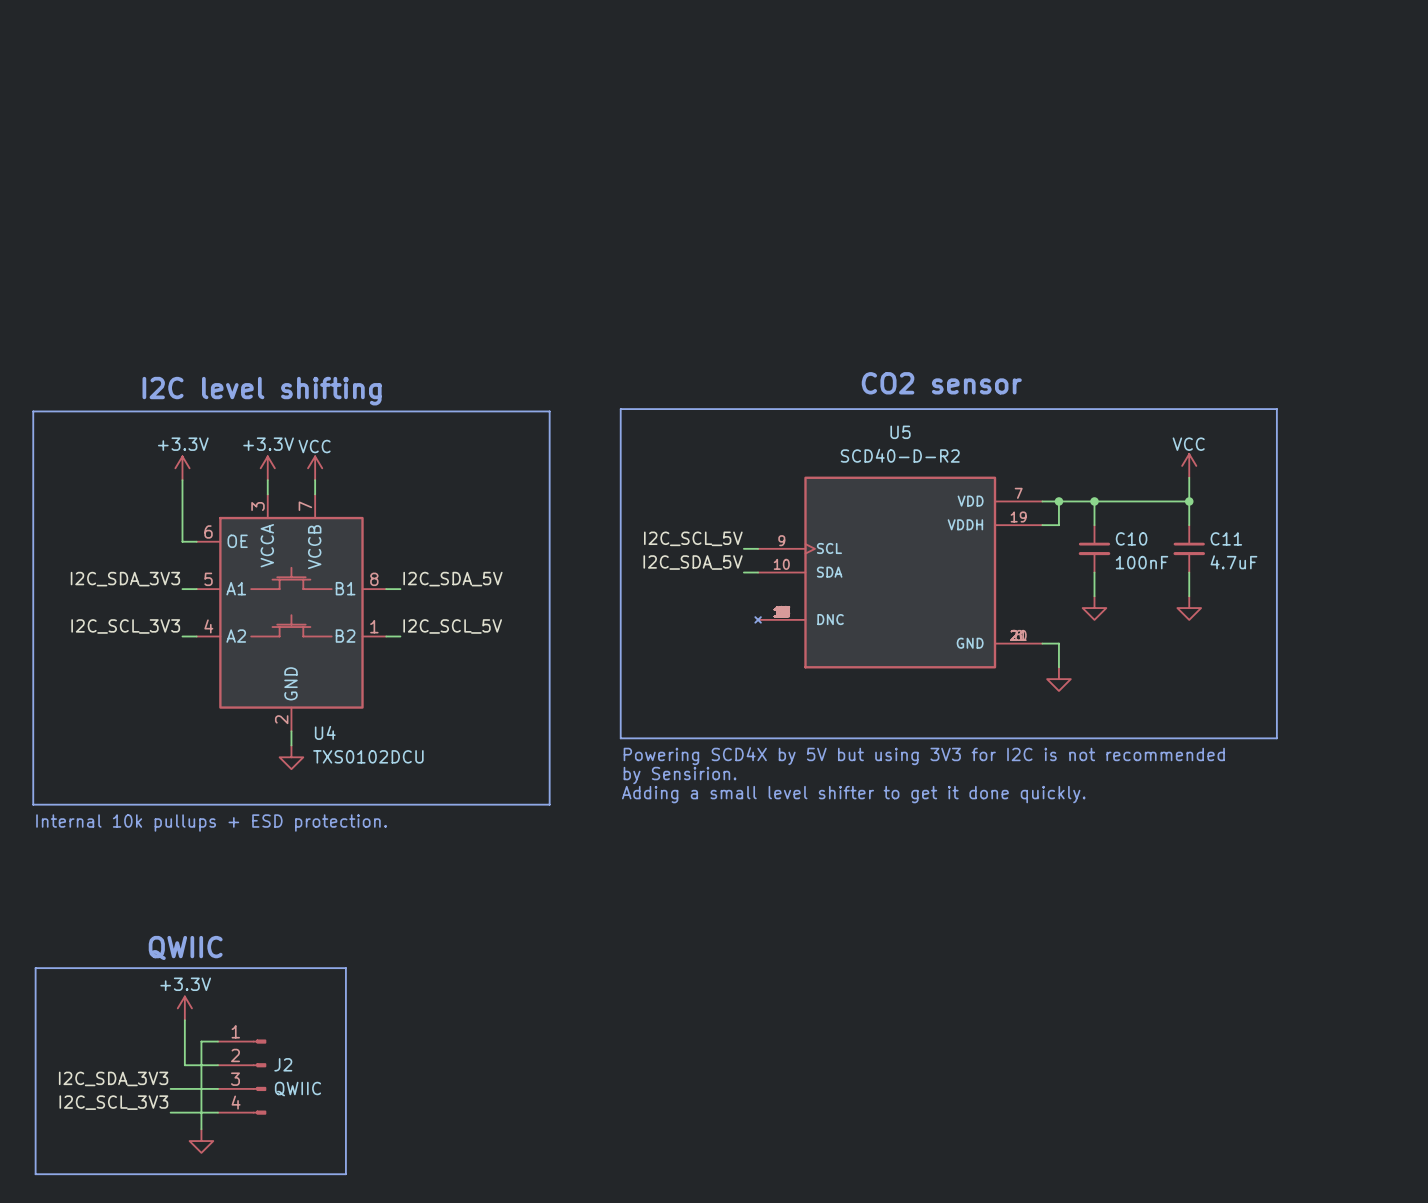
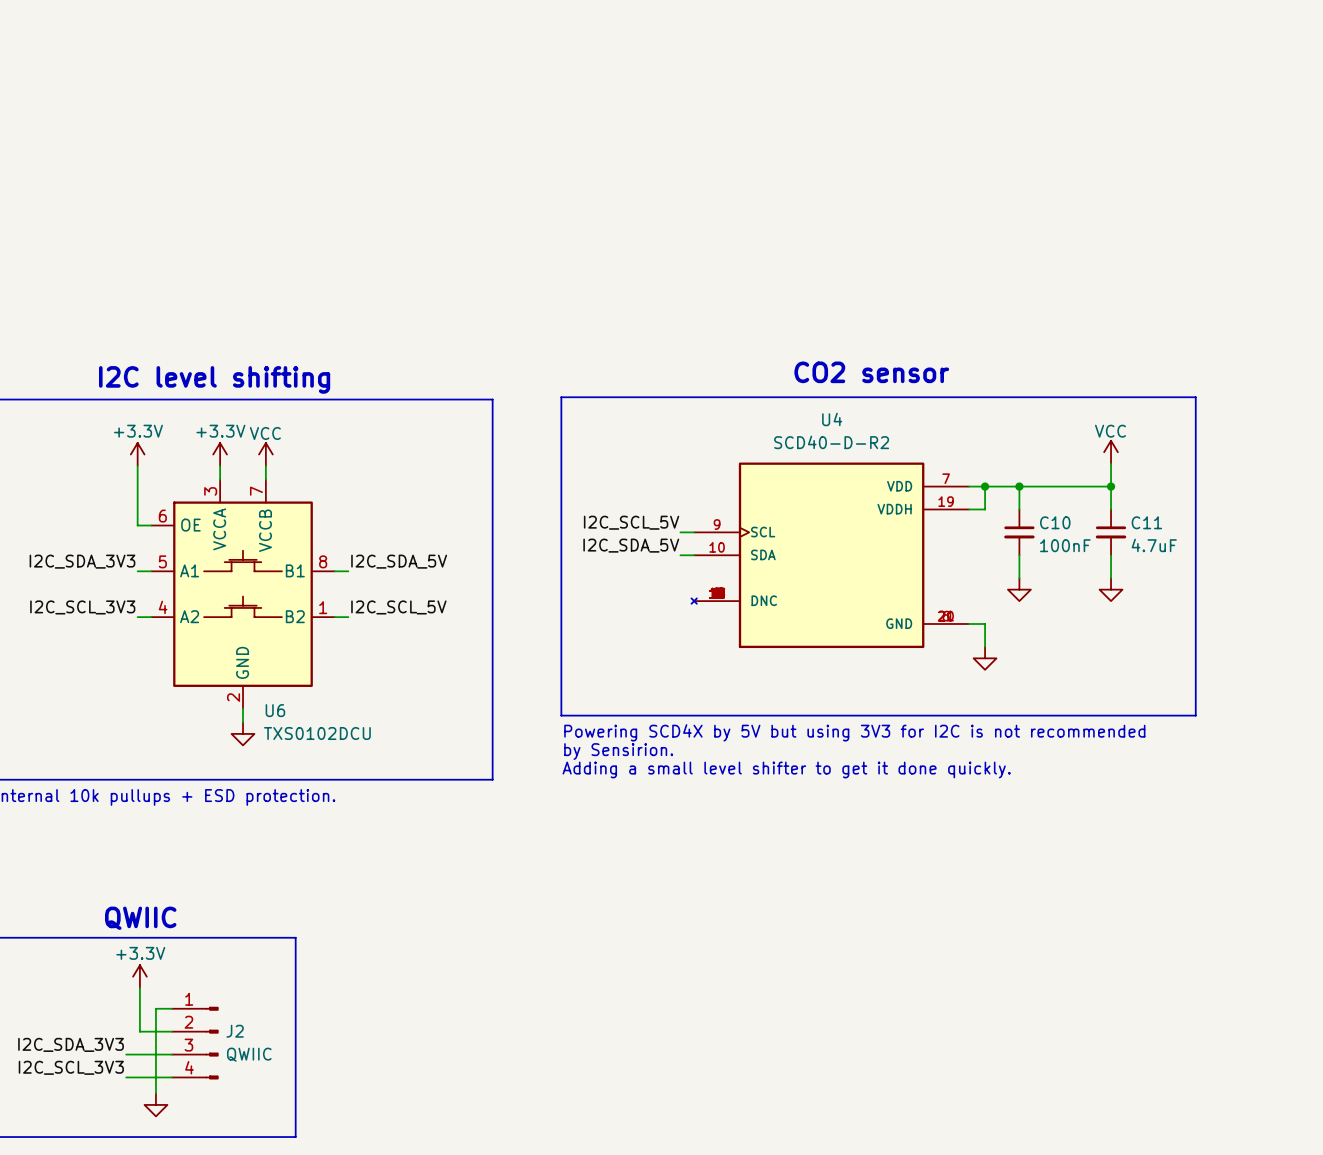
U5 name: U5 (900, 432) -> U4 (832, 419)
U4 name: U4 (325, 732) -> U6 (275, 710)

